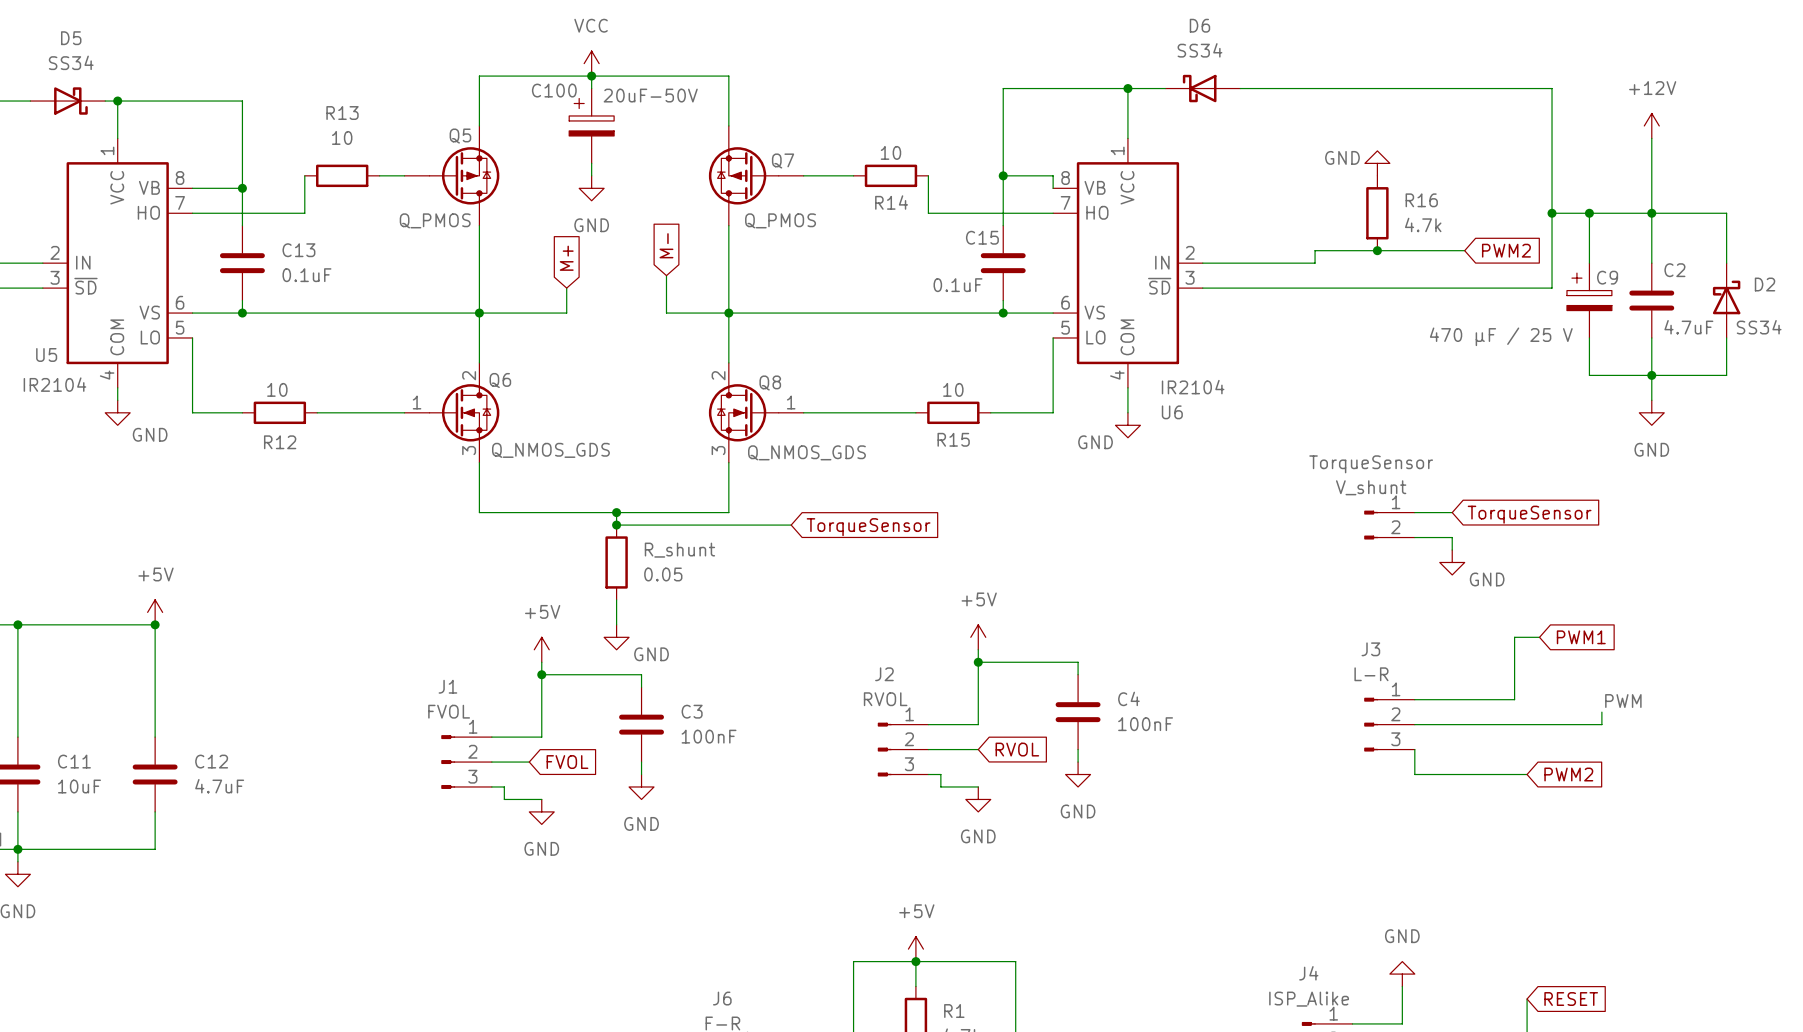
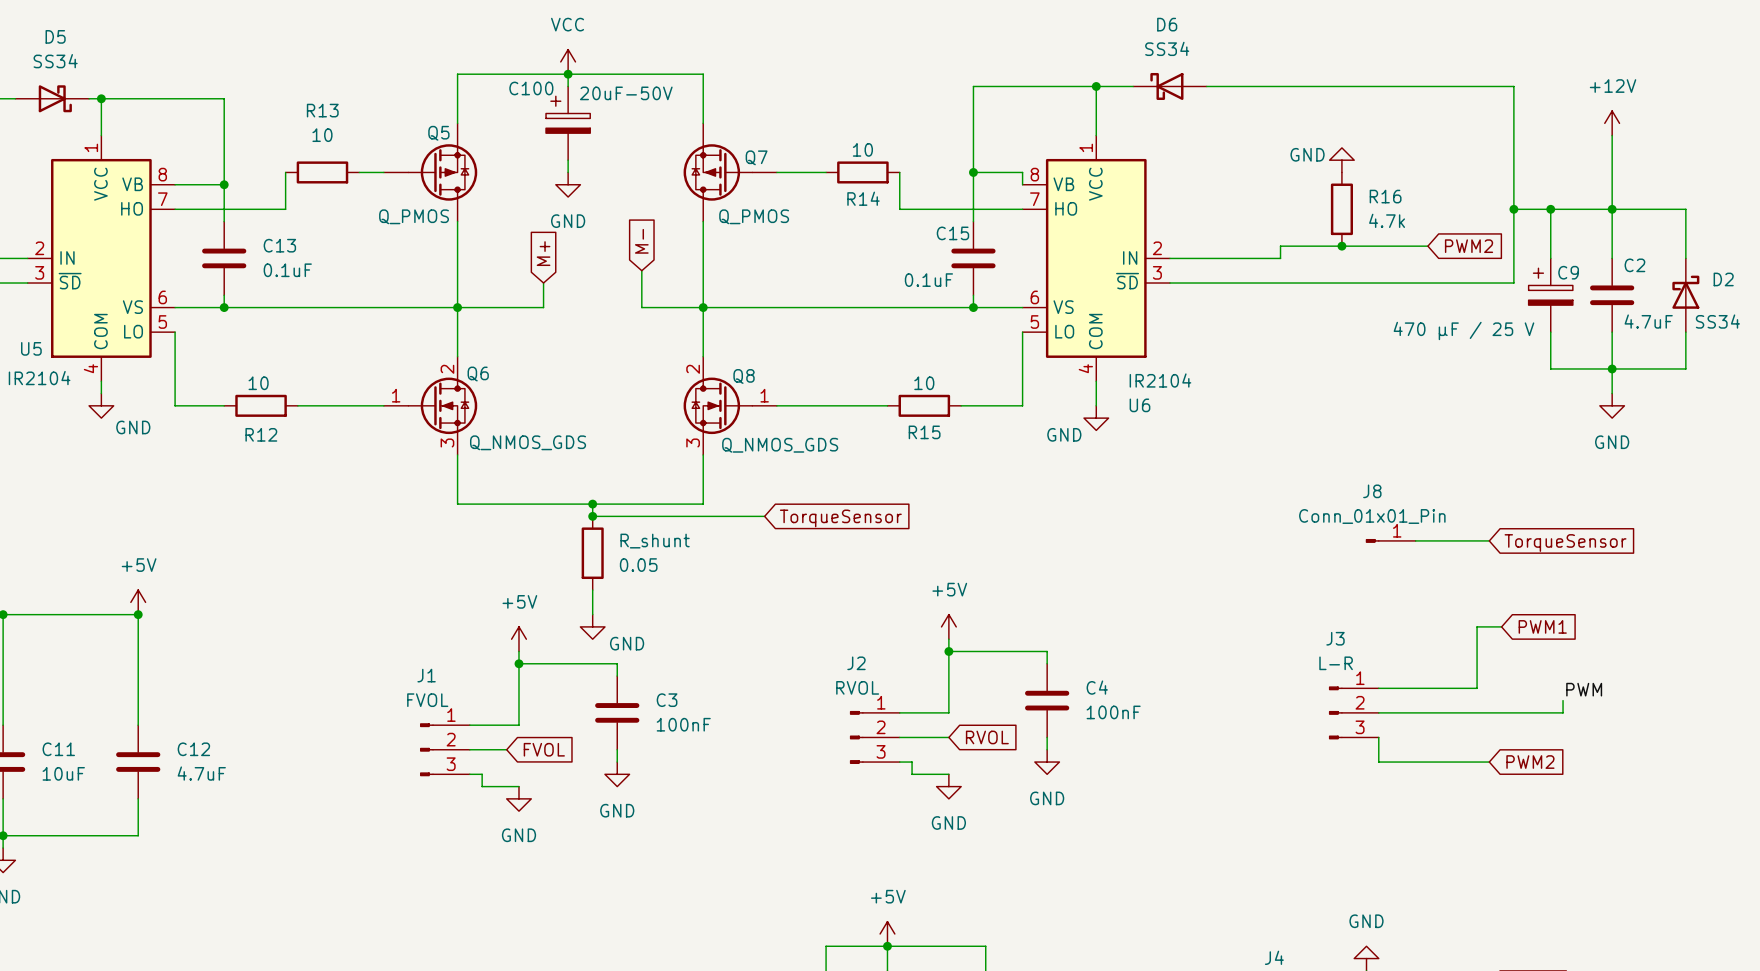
wire: (1414, 512) (1452, 512) -> none
global label position: TorqueSensor (1529, 514) -> TorqueSensor (1565, 542)
TorqueSensor: V_shunt (1389, 525) -> none
wire: (1414, 537) (1452, 537) (1452, 550) -> (1489, 540) (1415, 540)
J8: none -> Conn_01x01_Pin (1390, 540)
power symbol: GND (1452, 562) -> none

